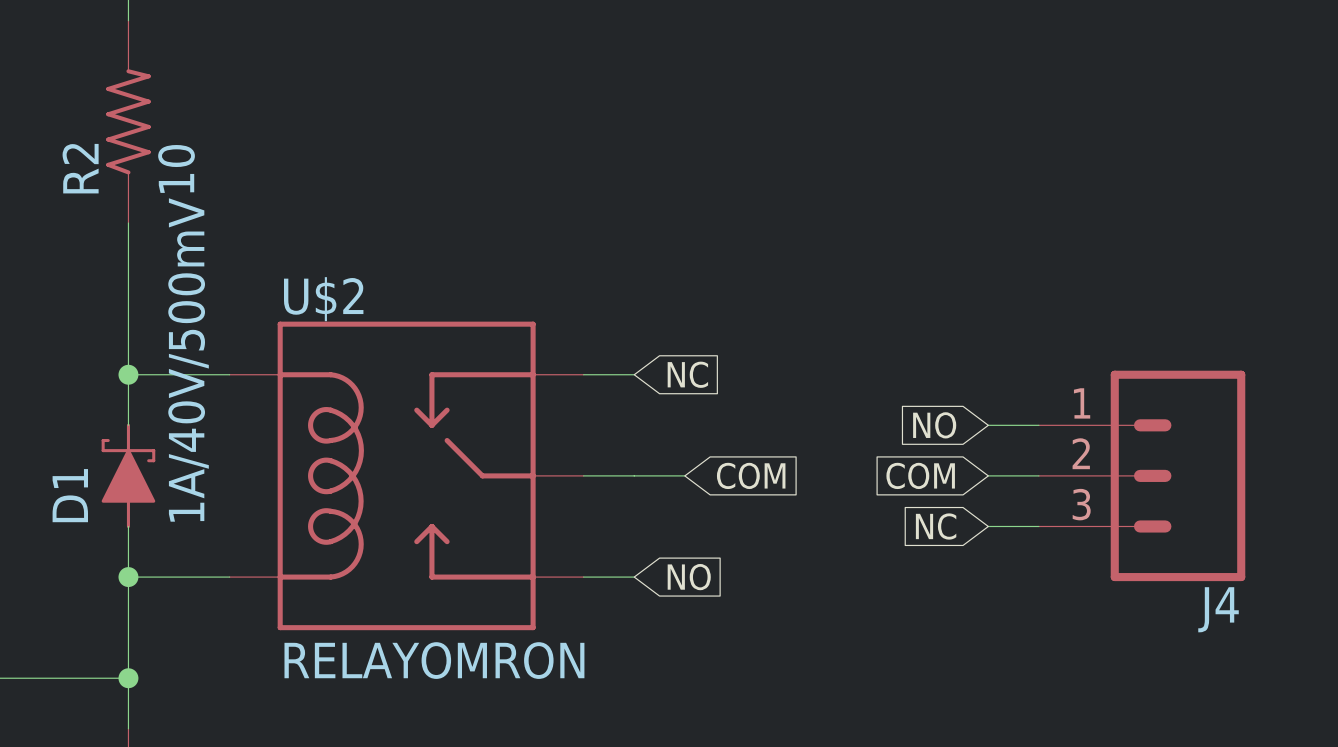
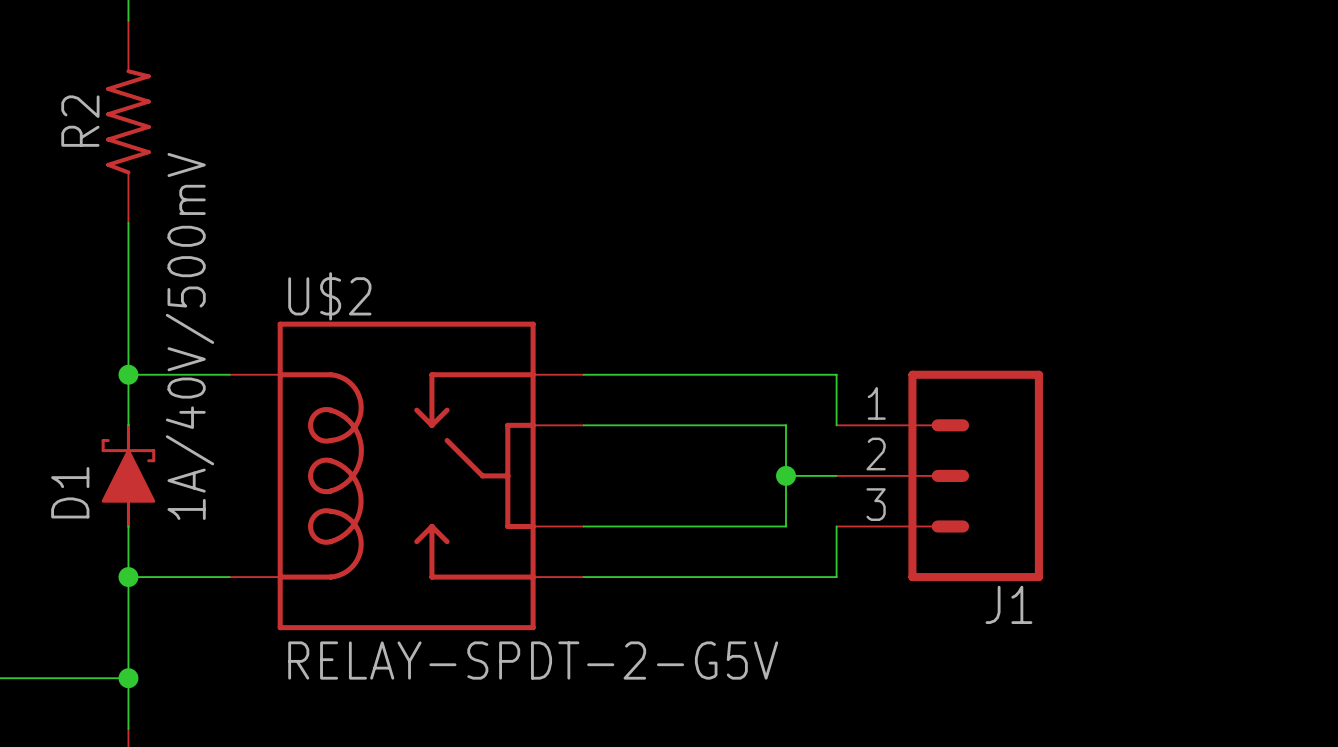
R2 name position: R2 (80, 168) -> R2 (80, 121)
R2 value: 10 (176, 168) -> none
U$2 symbol: [229, 321, 584, 631] -> [229, 321, 584, 631]
wire: none -> (634, 374) (836, 374) (836, 425)
global label: NC (687, 374) -> none
wire: none -> (583, 425) (786, 425) (786, 526) (583, 526)
global label: NO (934, 425) -> none
wire: (988, 425) (1038, 425) -> none
wire: (583, 475) (684, 475) -> none
global label: COM (751, 475) -> none
junction: none -> (786, 475)
global label: COM (920, 475) -> none
J1: none -> (939, 475)
wire: (988, 475) (1038, 475) -> (786, 475) (836, 475)
J4: (1142, 475) -> none
wire: none -> (836, 526) (836, 577) (634, 577)
global label: NC (936, 526) -> none
wire: (988, 526) (1038, 526) -> none
global label: NO (689, 577) -> none
U$2 value: RELAYOMRON (434, 660) -> RELAY-SPDT-2-G5V (533, 660)

